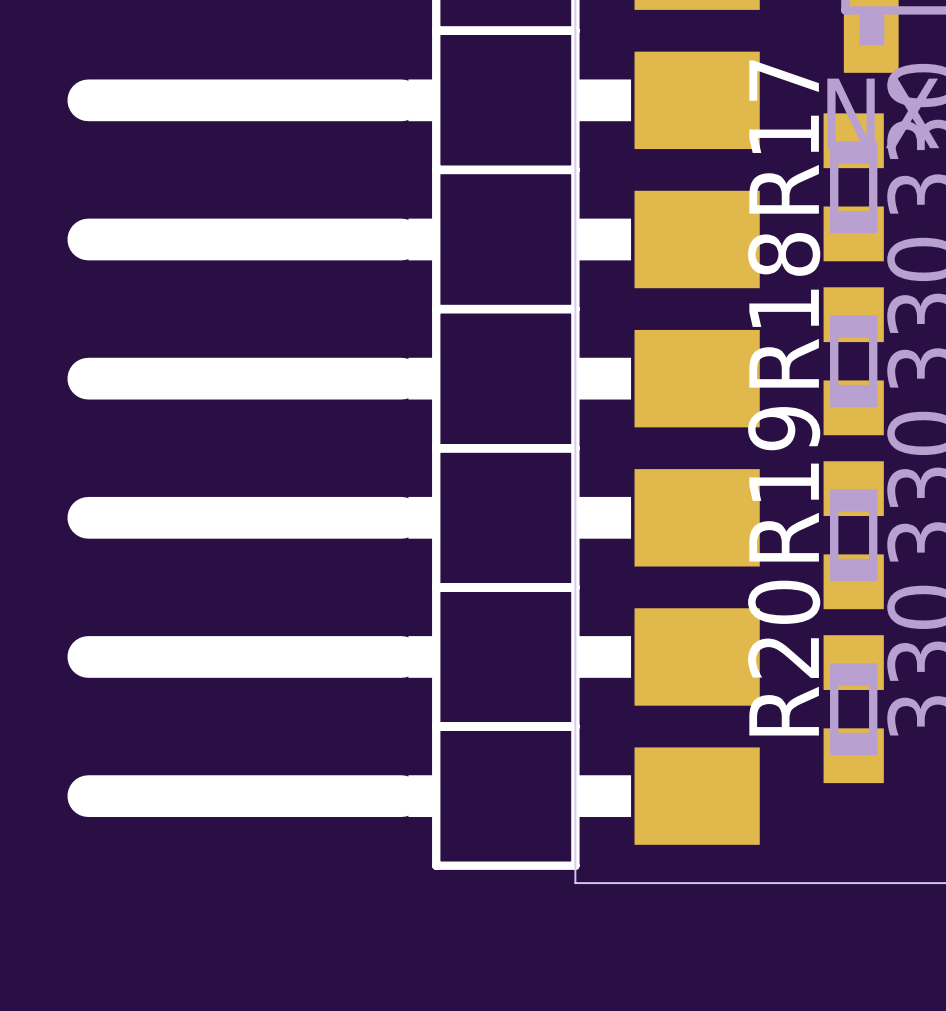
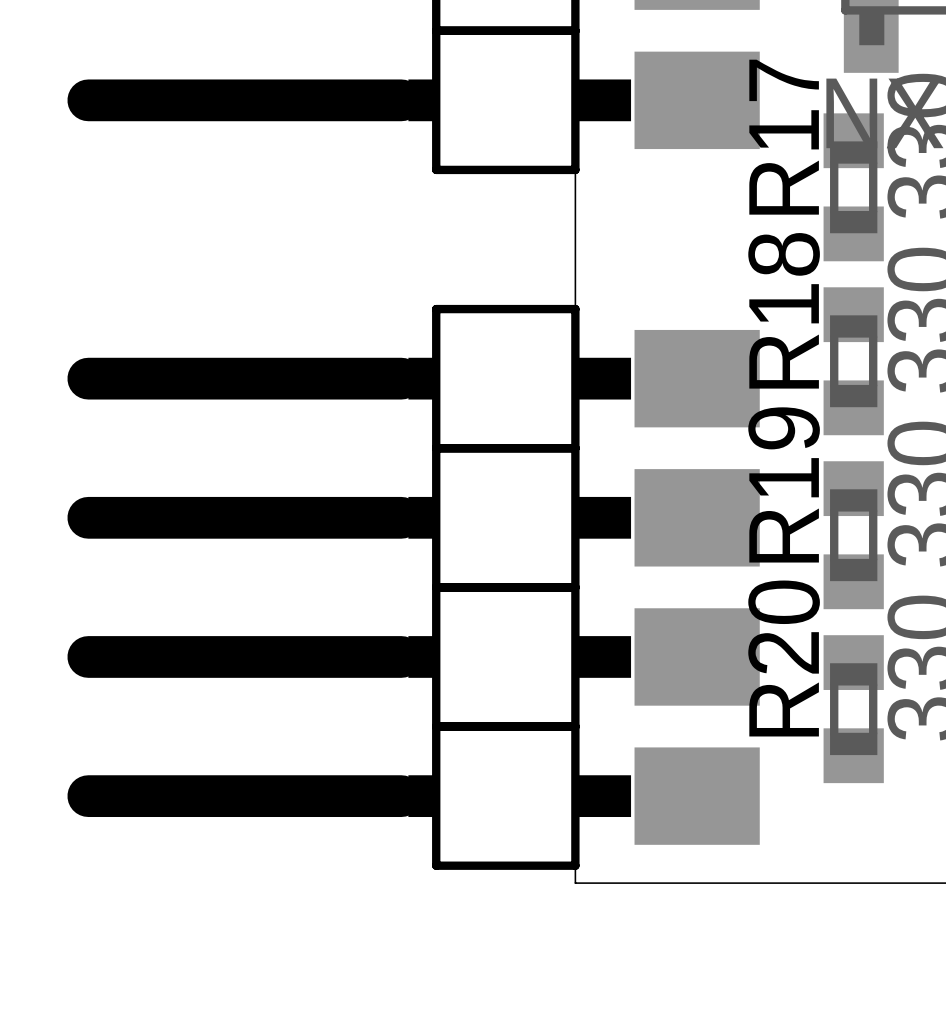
part: (413, 239) -> none

